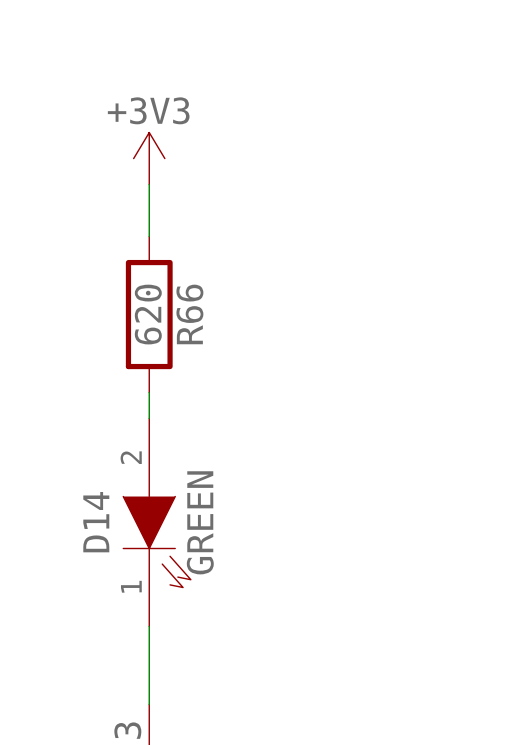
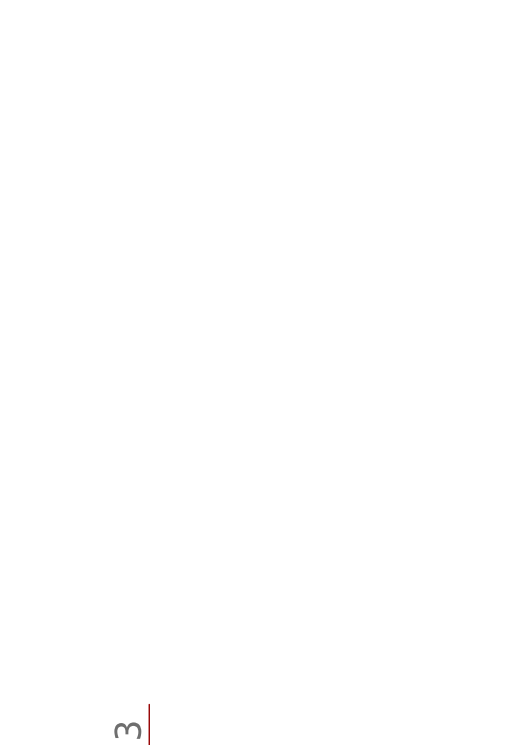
power symbol: +3V3 (149, 158) -> none
wire: (149, 184) (149, 236) -> none
R66: 620 (149, 314) -> none
wire: (149, 392) (149, 418) -> none
D14: GREEN (157, 522) -> none
wire: (149, 626) (149, 704) -> none

